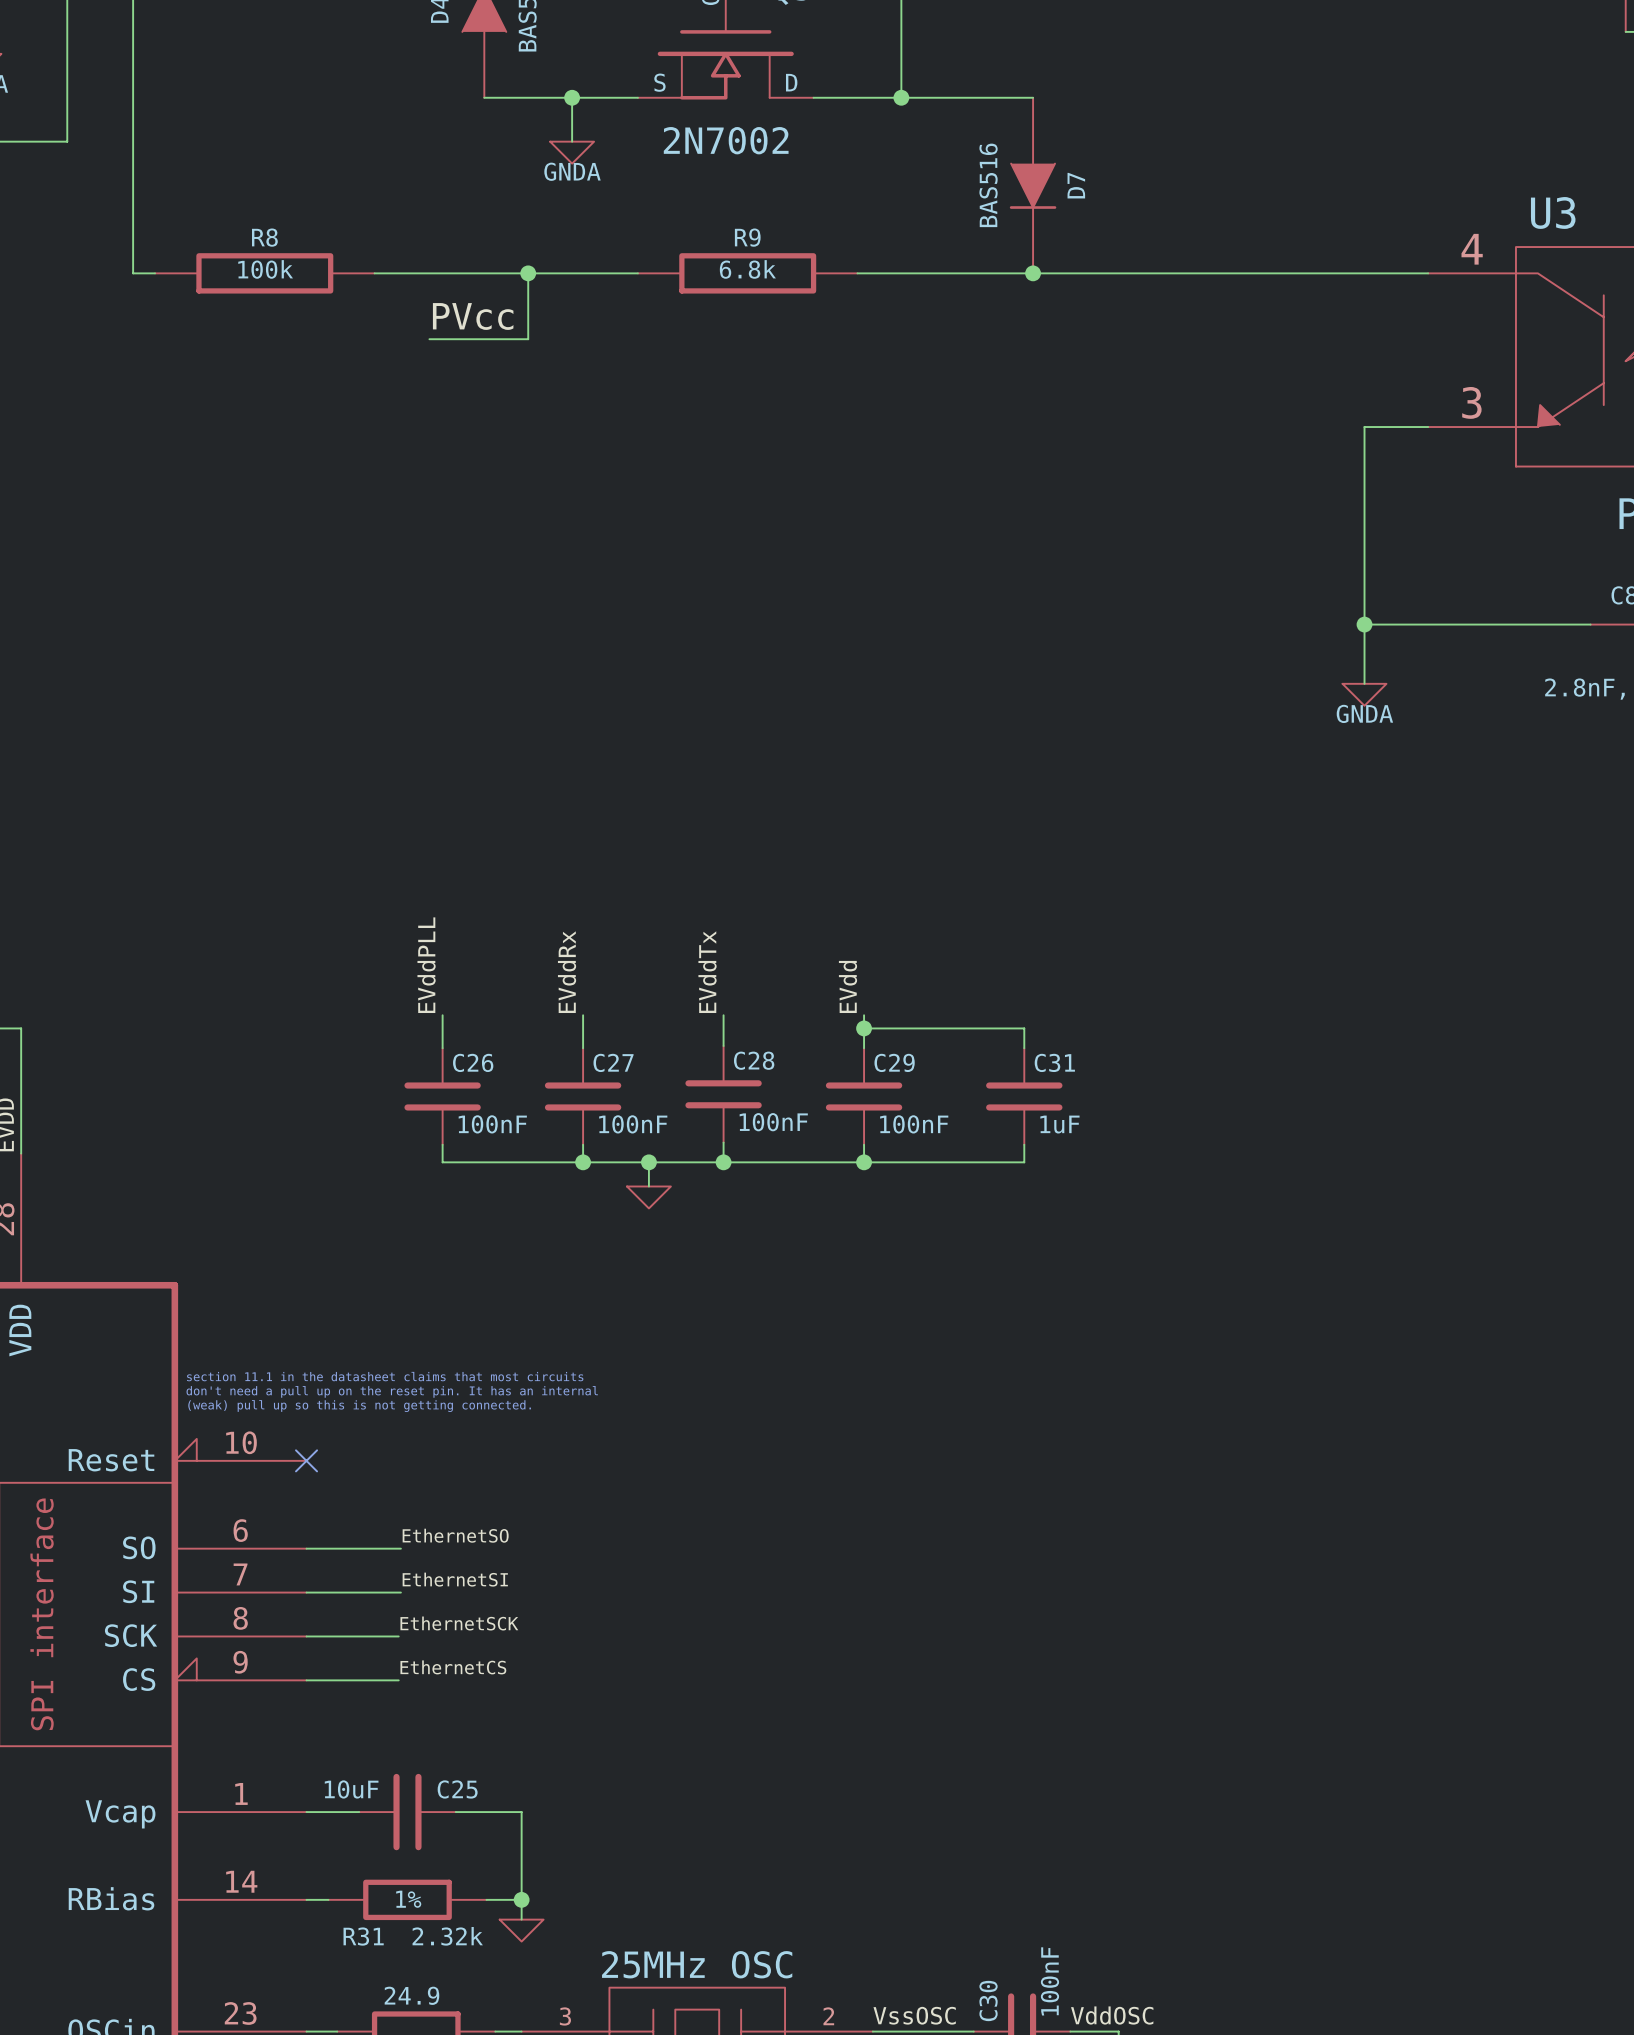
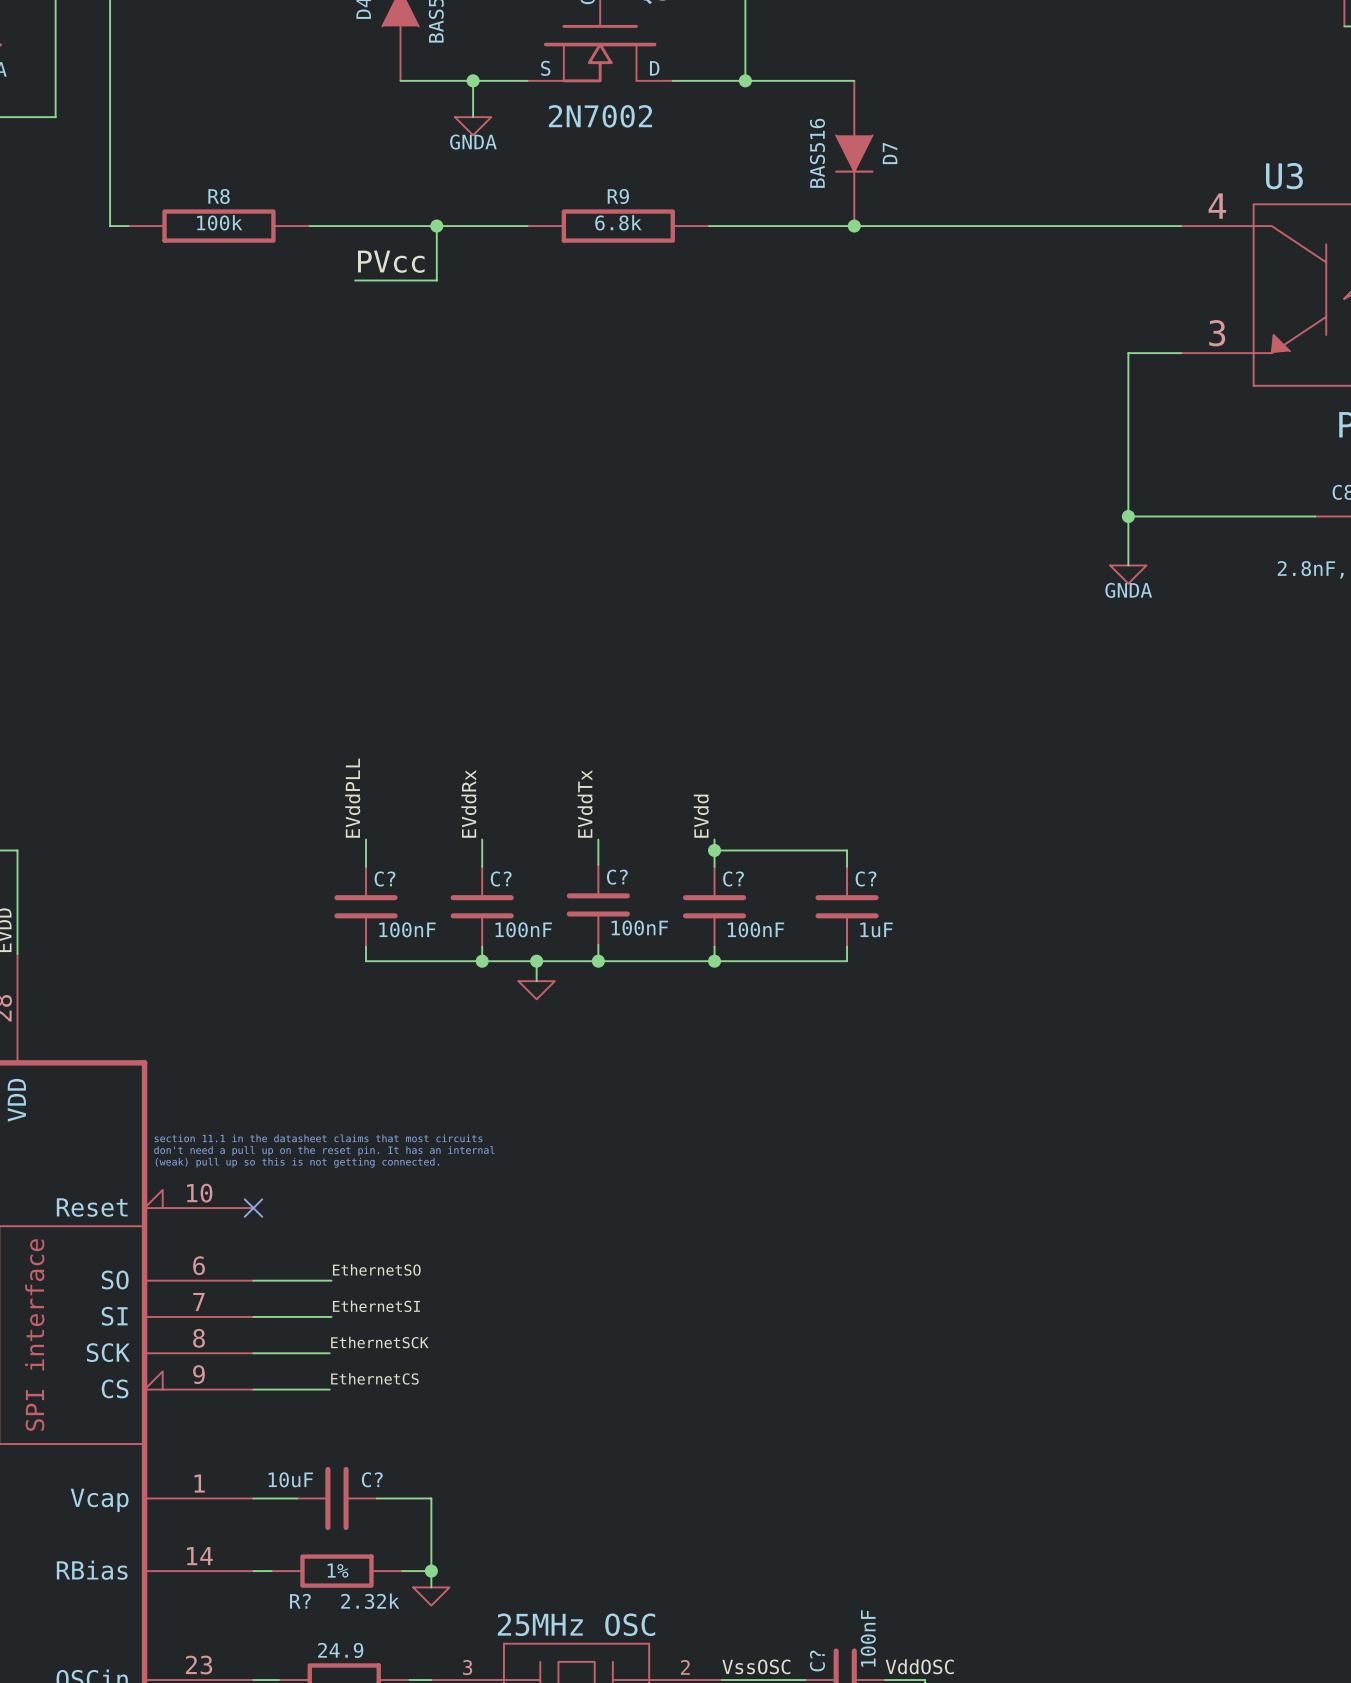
C28 name: C28 (754, 1060) -> C? (617, 877)
C26 name: C26 (473, 1062) -> C? (385, 878)
C27 name: C27 (613, 1062) -> C? (501, 878)
C29 name: C29 (894, 1062) -> C? (733, 878)
C31 name: C31 (1054, 1062) -> C? (866, 878)
C25 name: C25 (457, 1789) -> C? (372, 1479)
R31 name: R31 (363, 1936) -> R? (300, 1601)
C30 name: C30 (988, 2001) -> C? (817, 1661)

